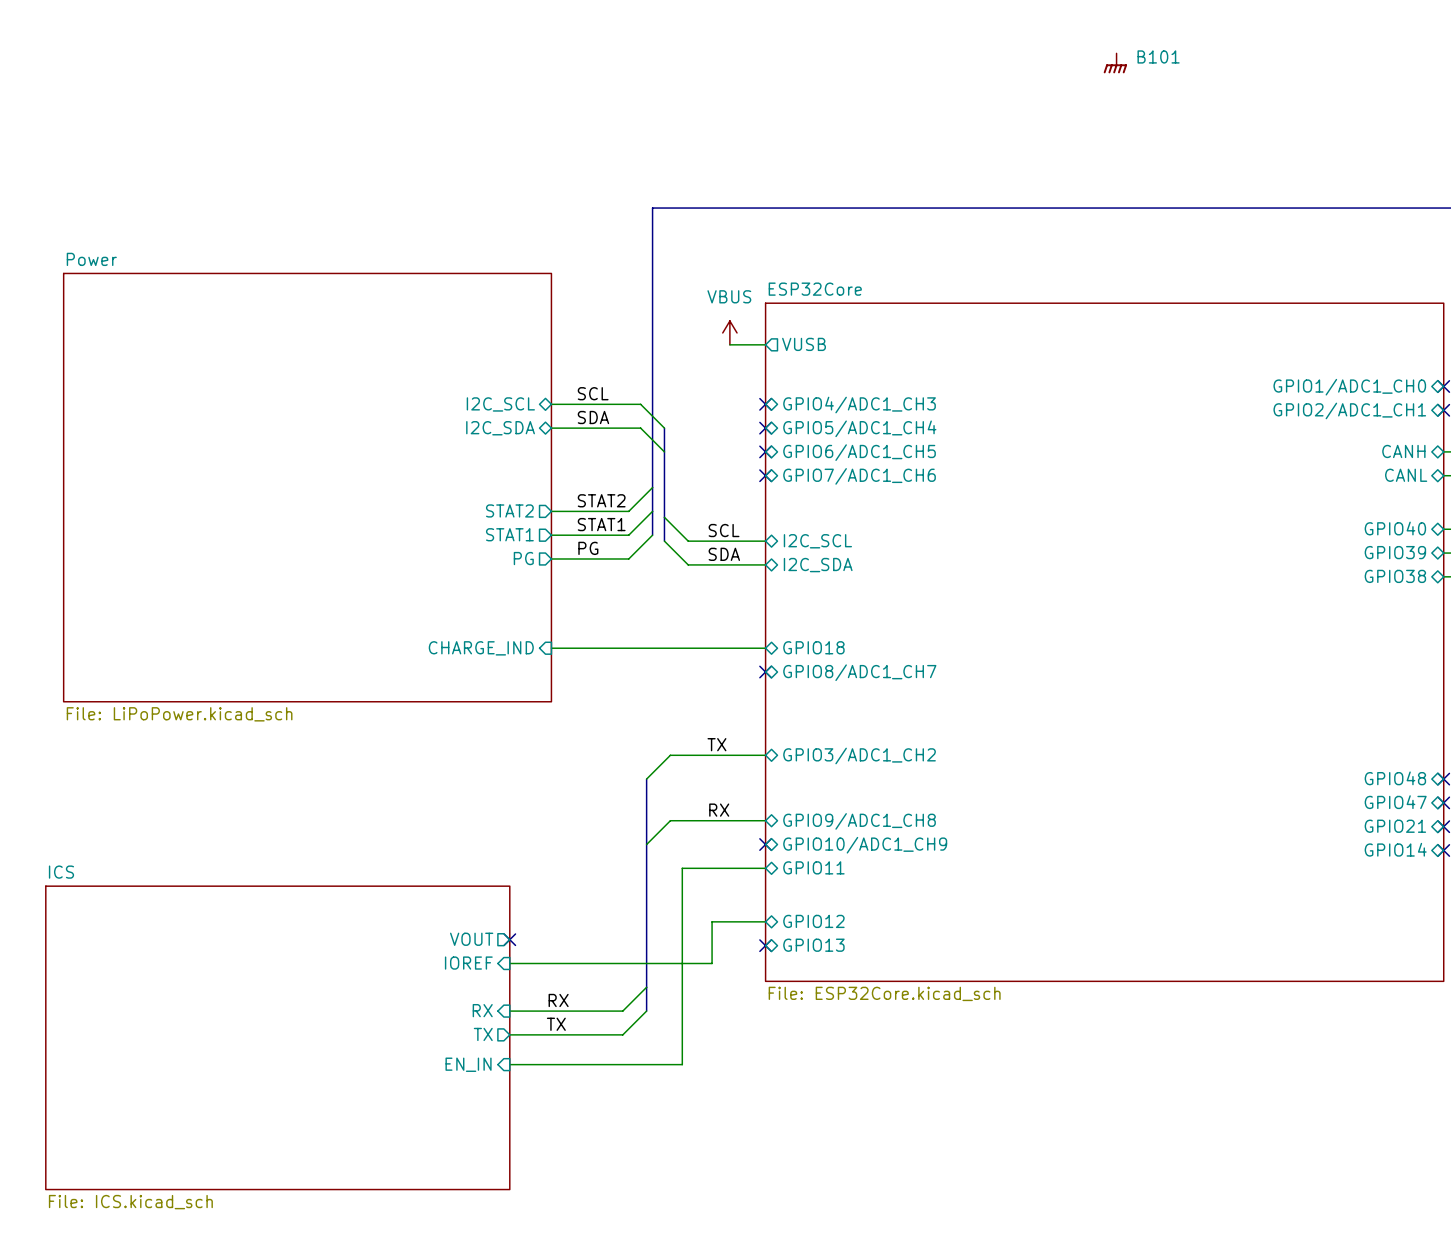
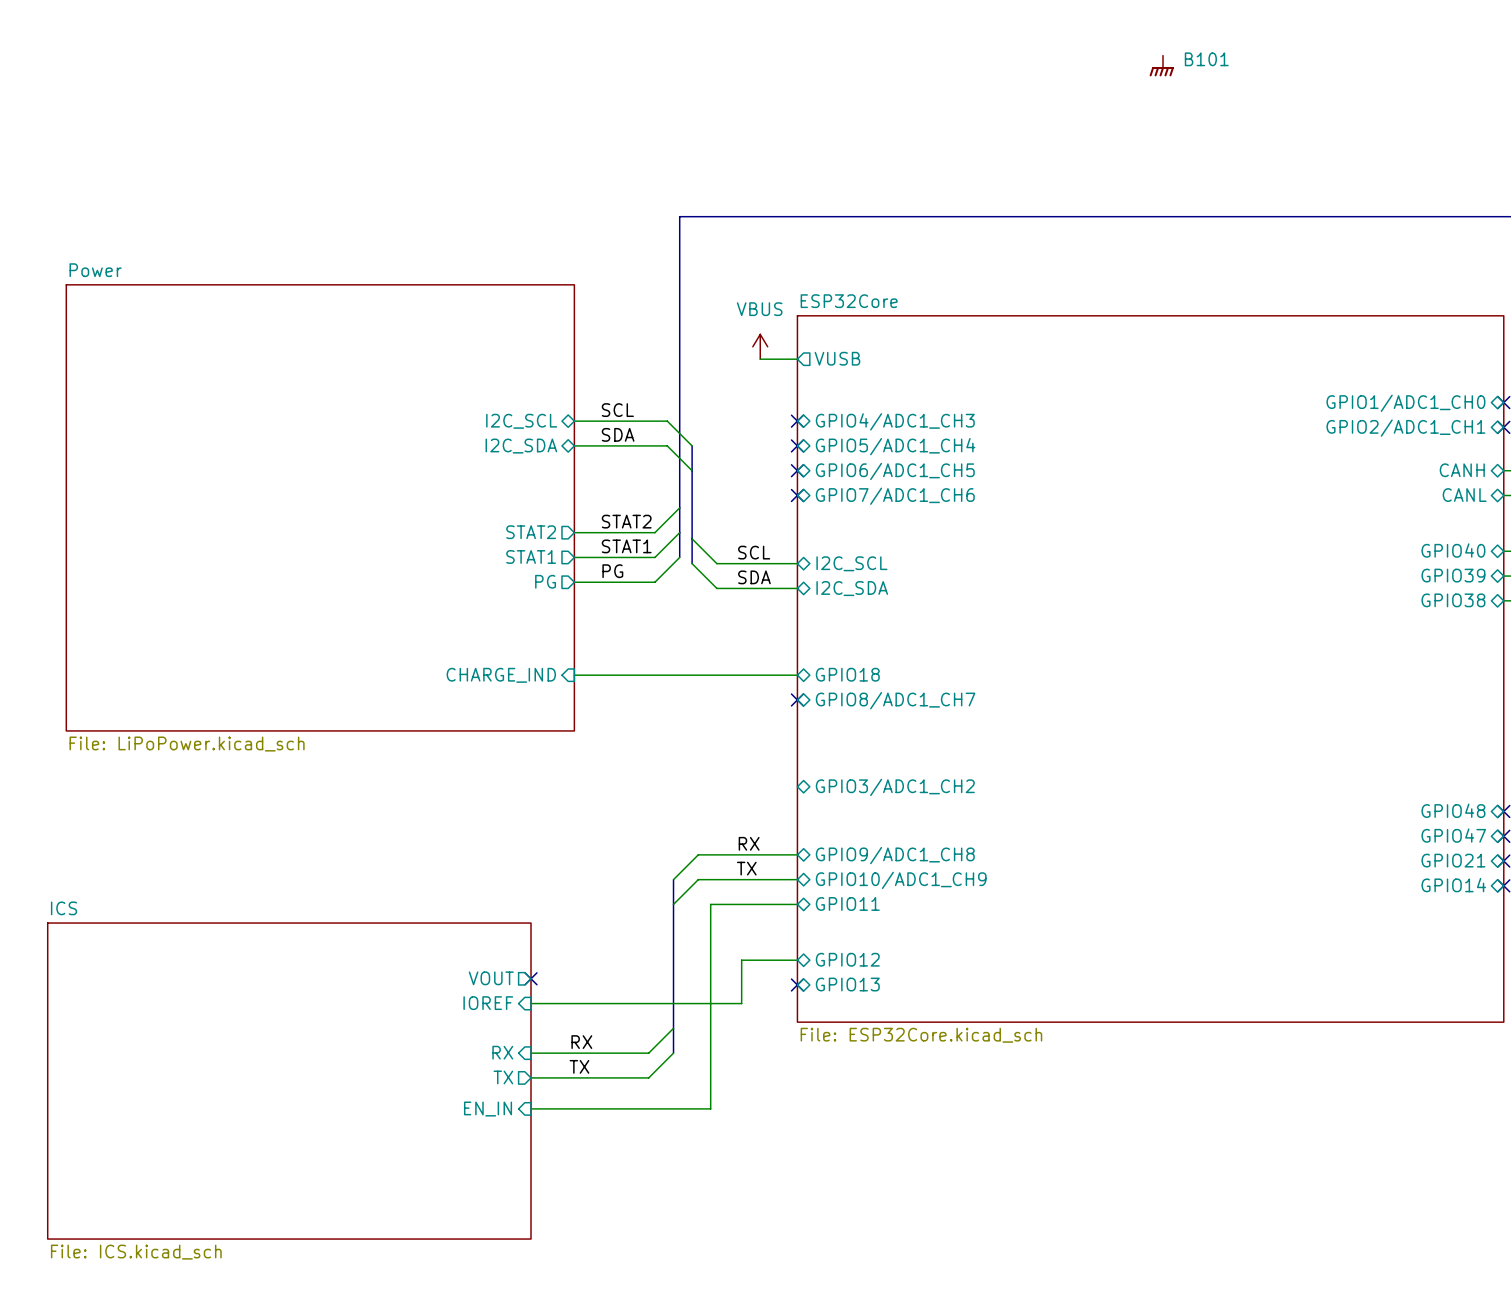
label position: TX (716, 744) -> TX (746, 868)
wire: (765, 755) (670, 755) (646, 779) -> (797, 879) (698, 879) (673, 904)
bus: (646, 779) (646, 844) -> none
no-connect mark: (765, 844) -> none

